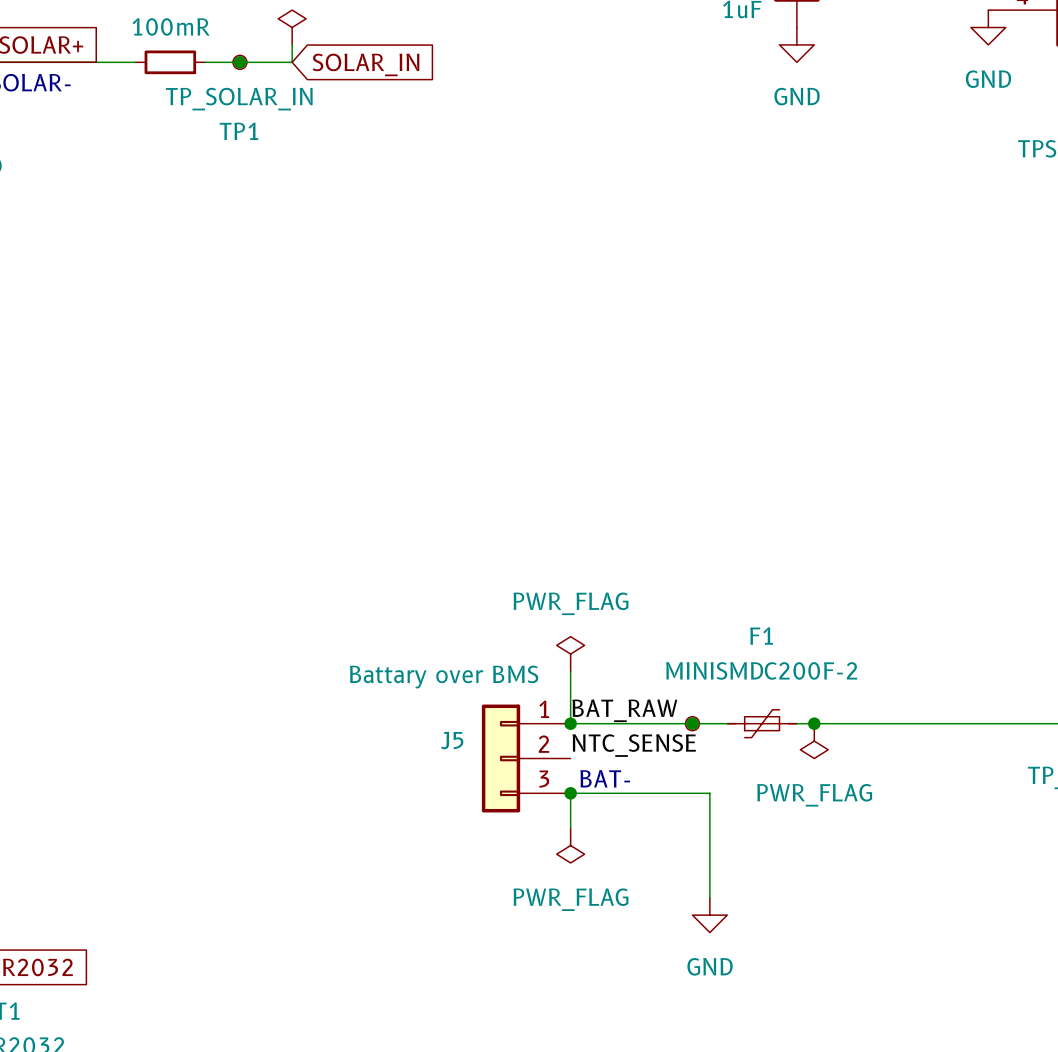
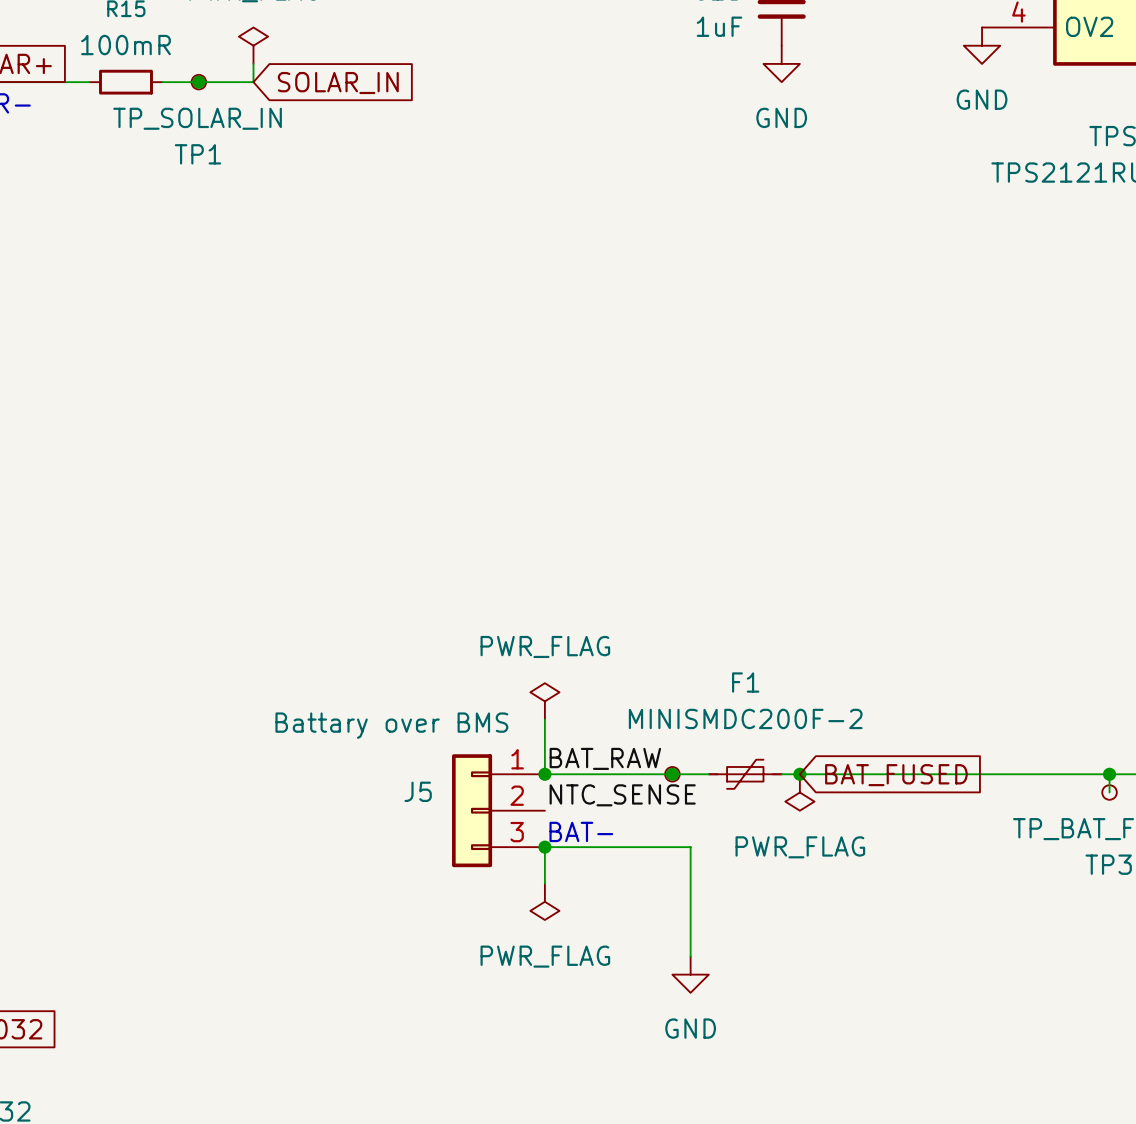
global label: none -> BAT_FUSED (896, 775)

